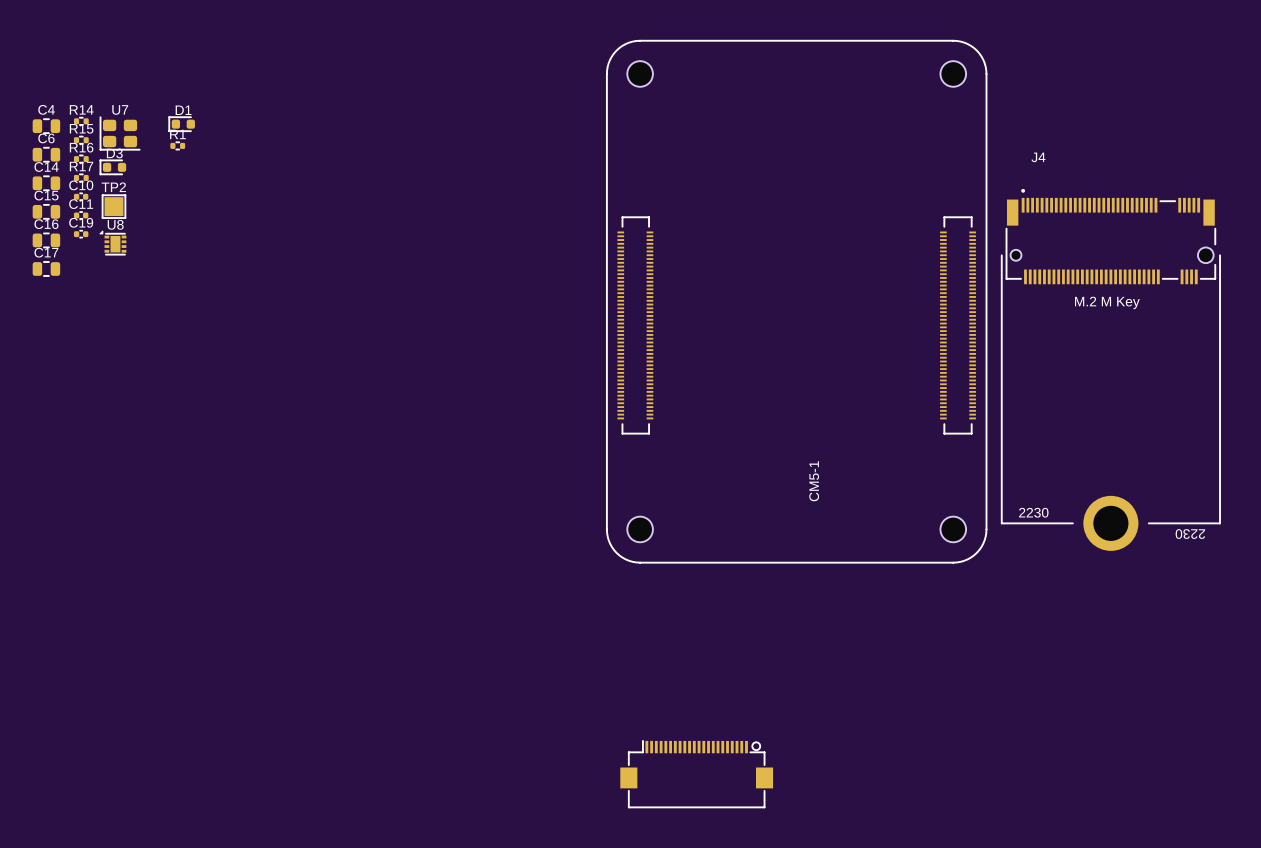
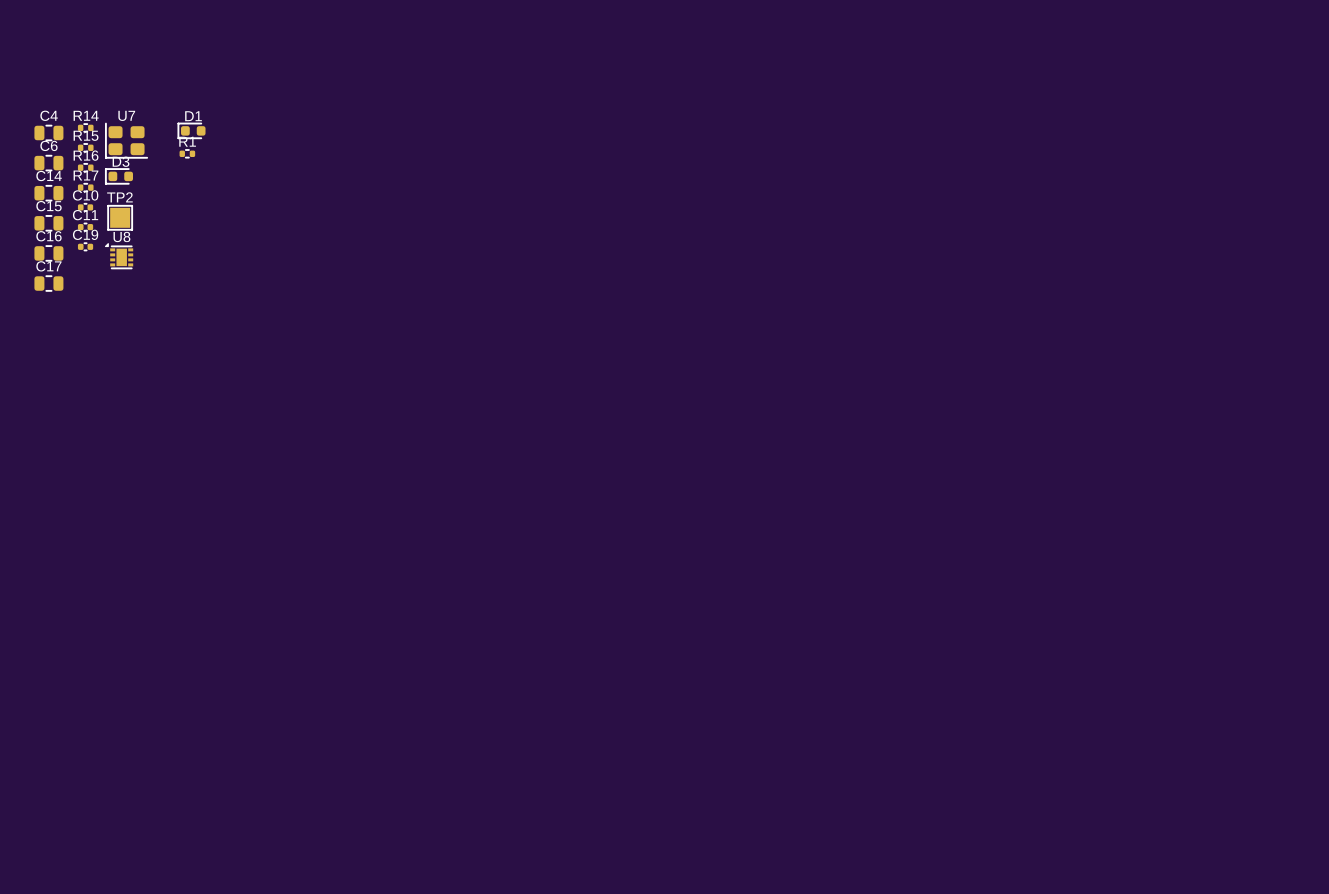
CM5-1: (796, 301) -> none
J4: (1110, 369) -> none
part: (696, 774) -> none

